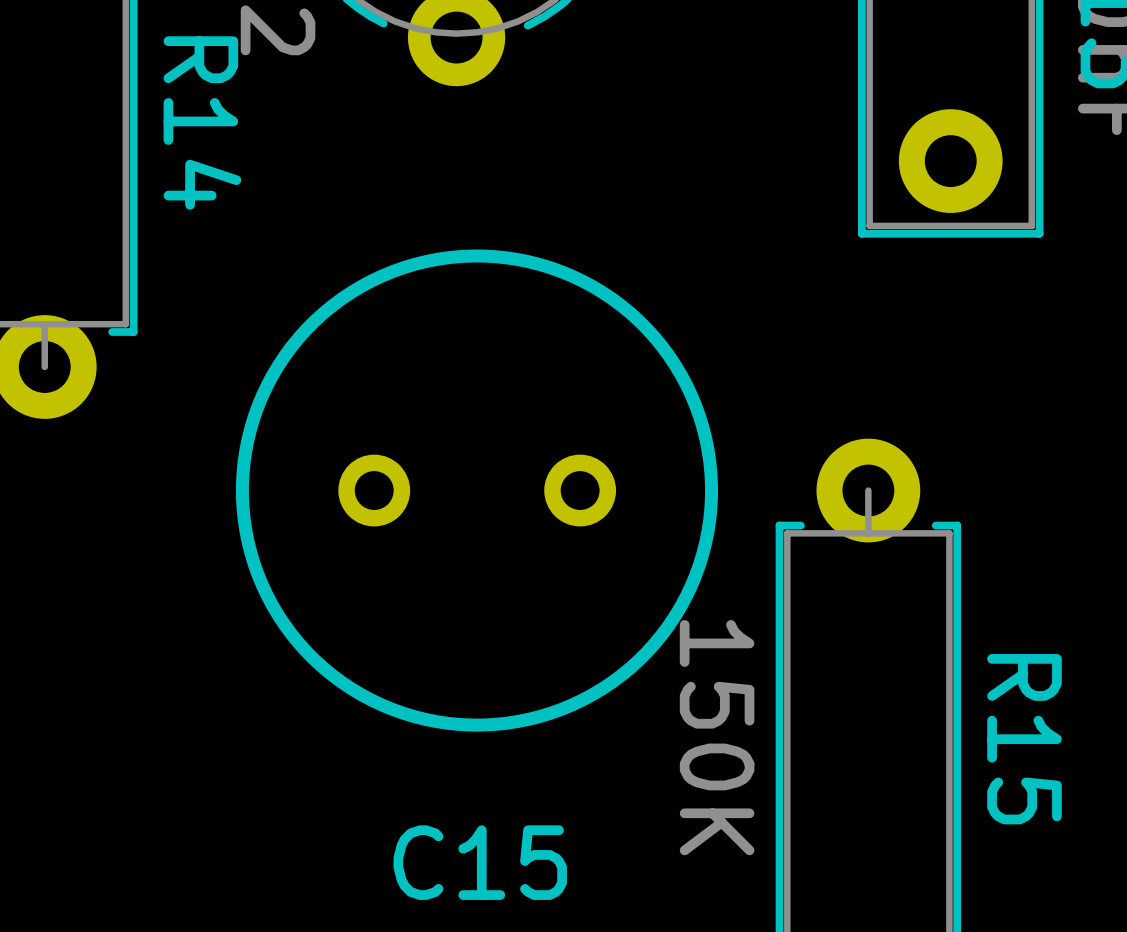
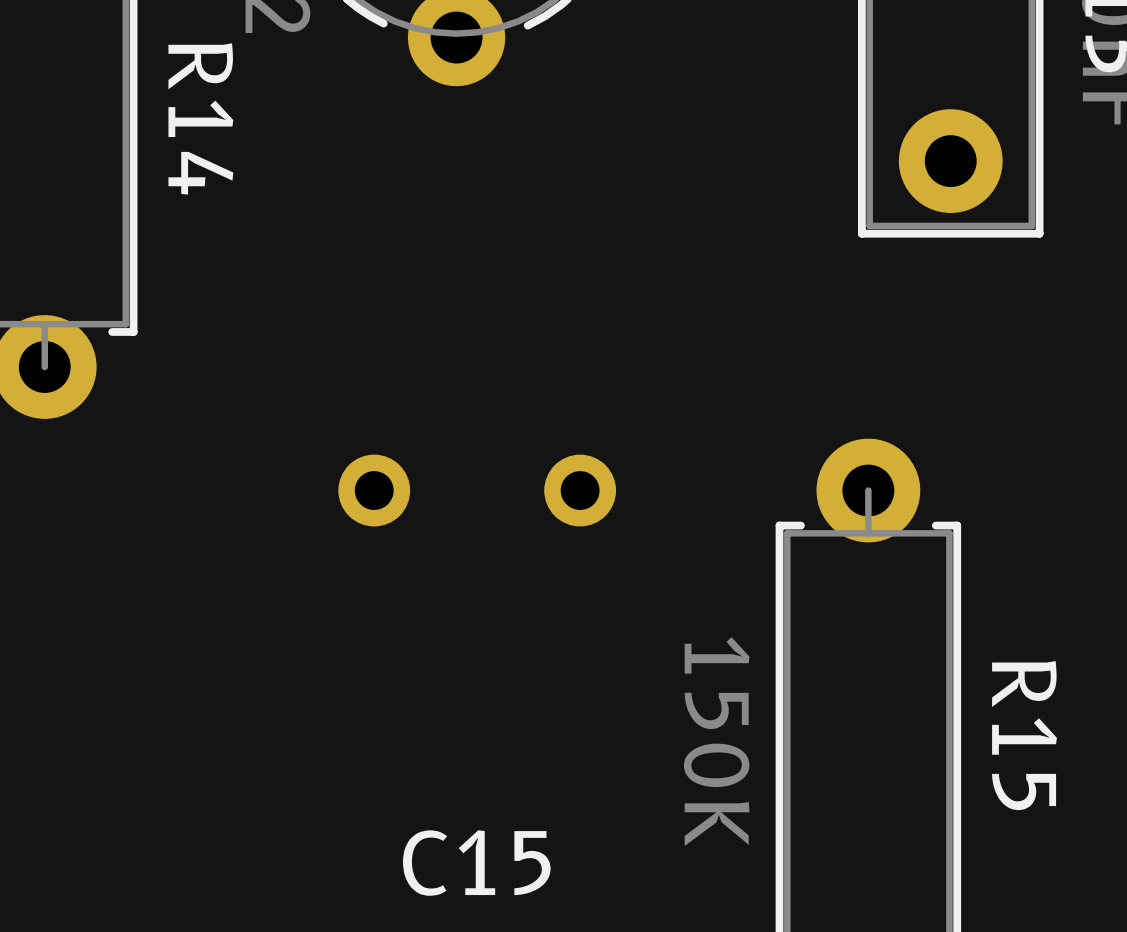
drawing: [235, 249, 719, 732] -> none

